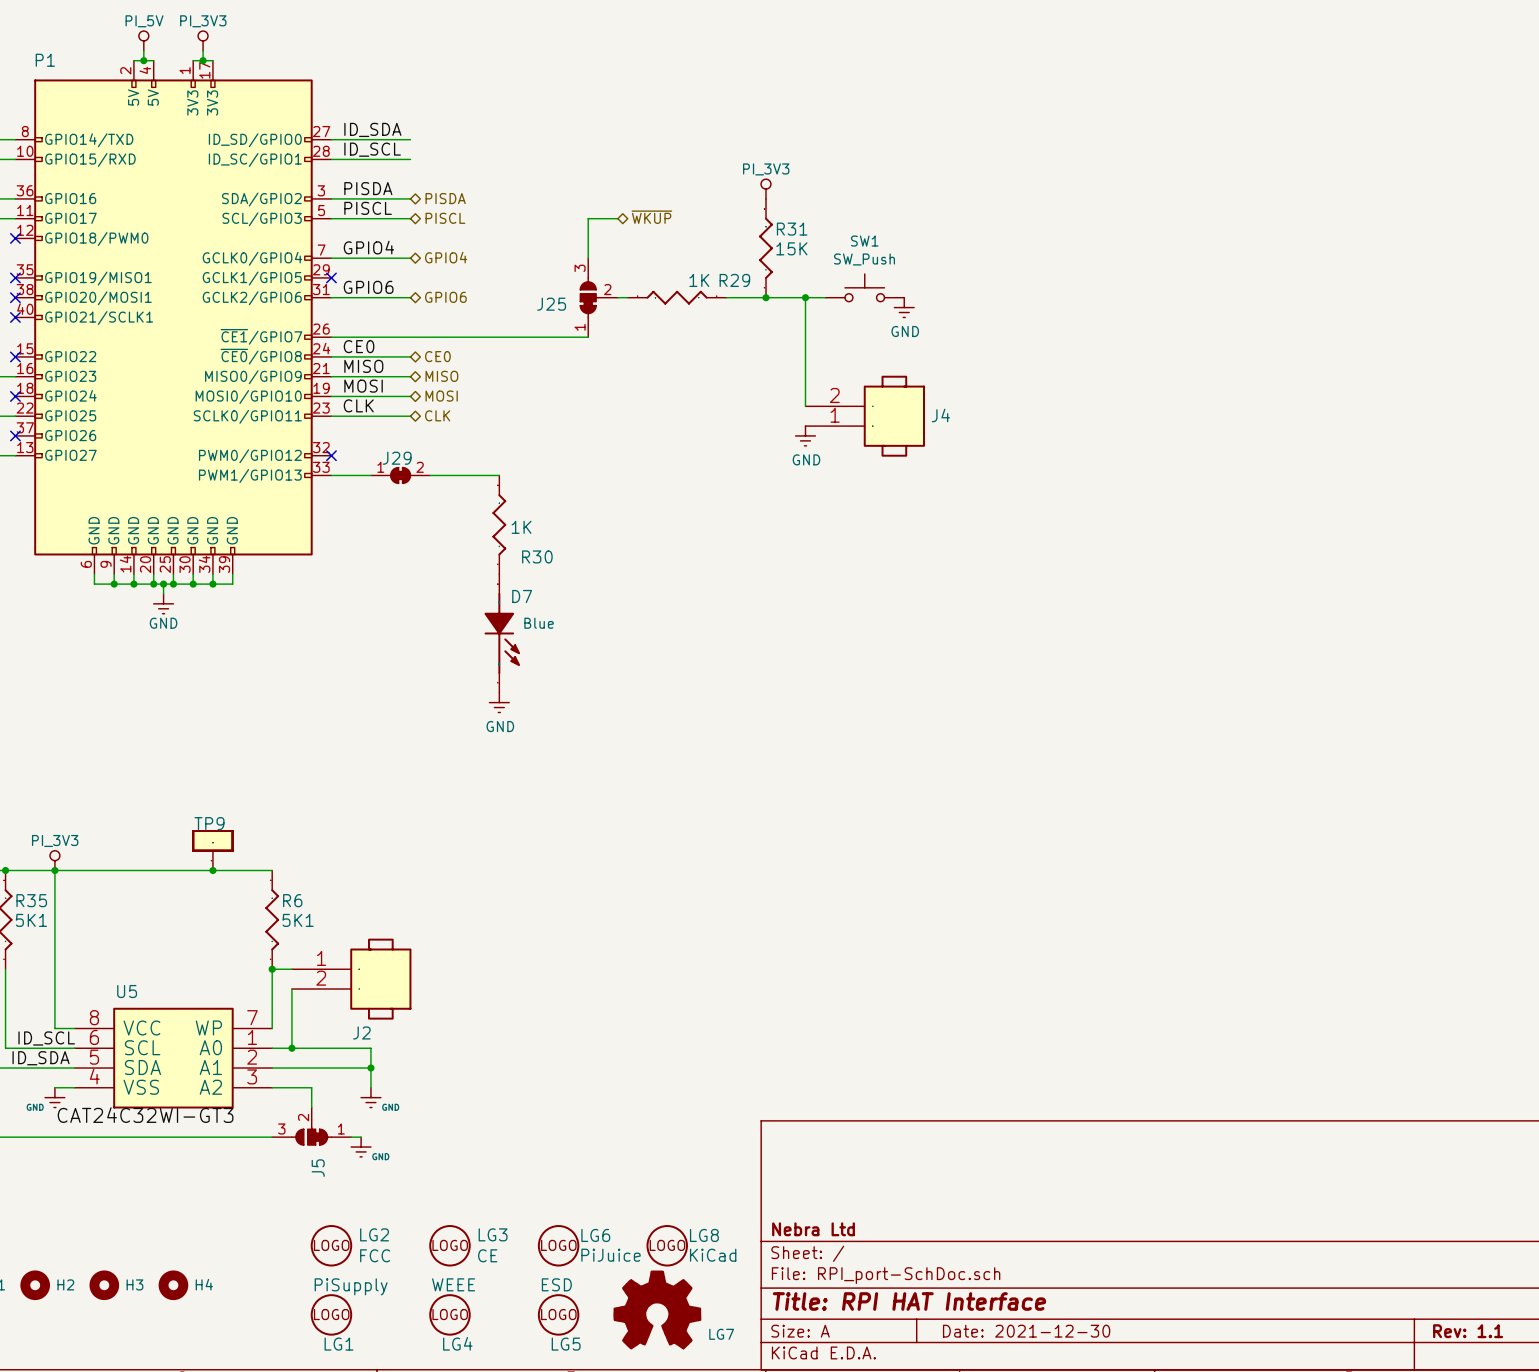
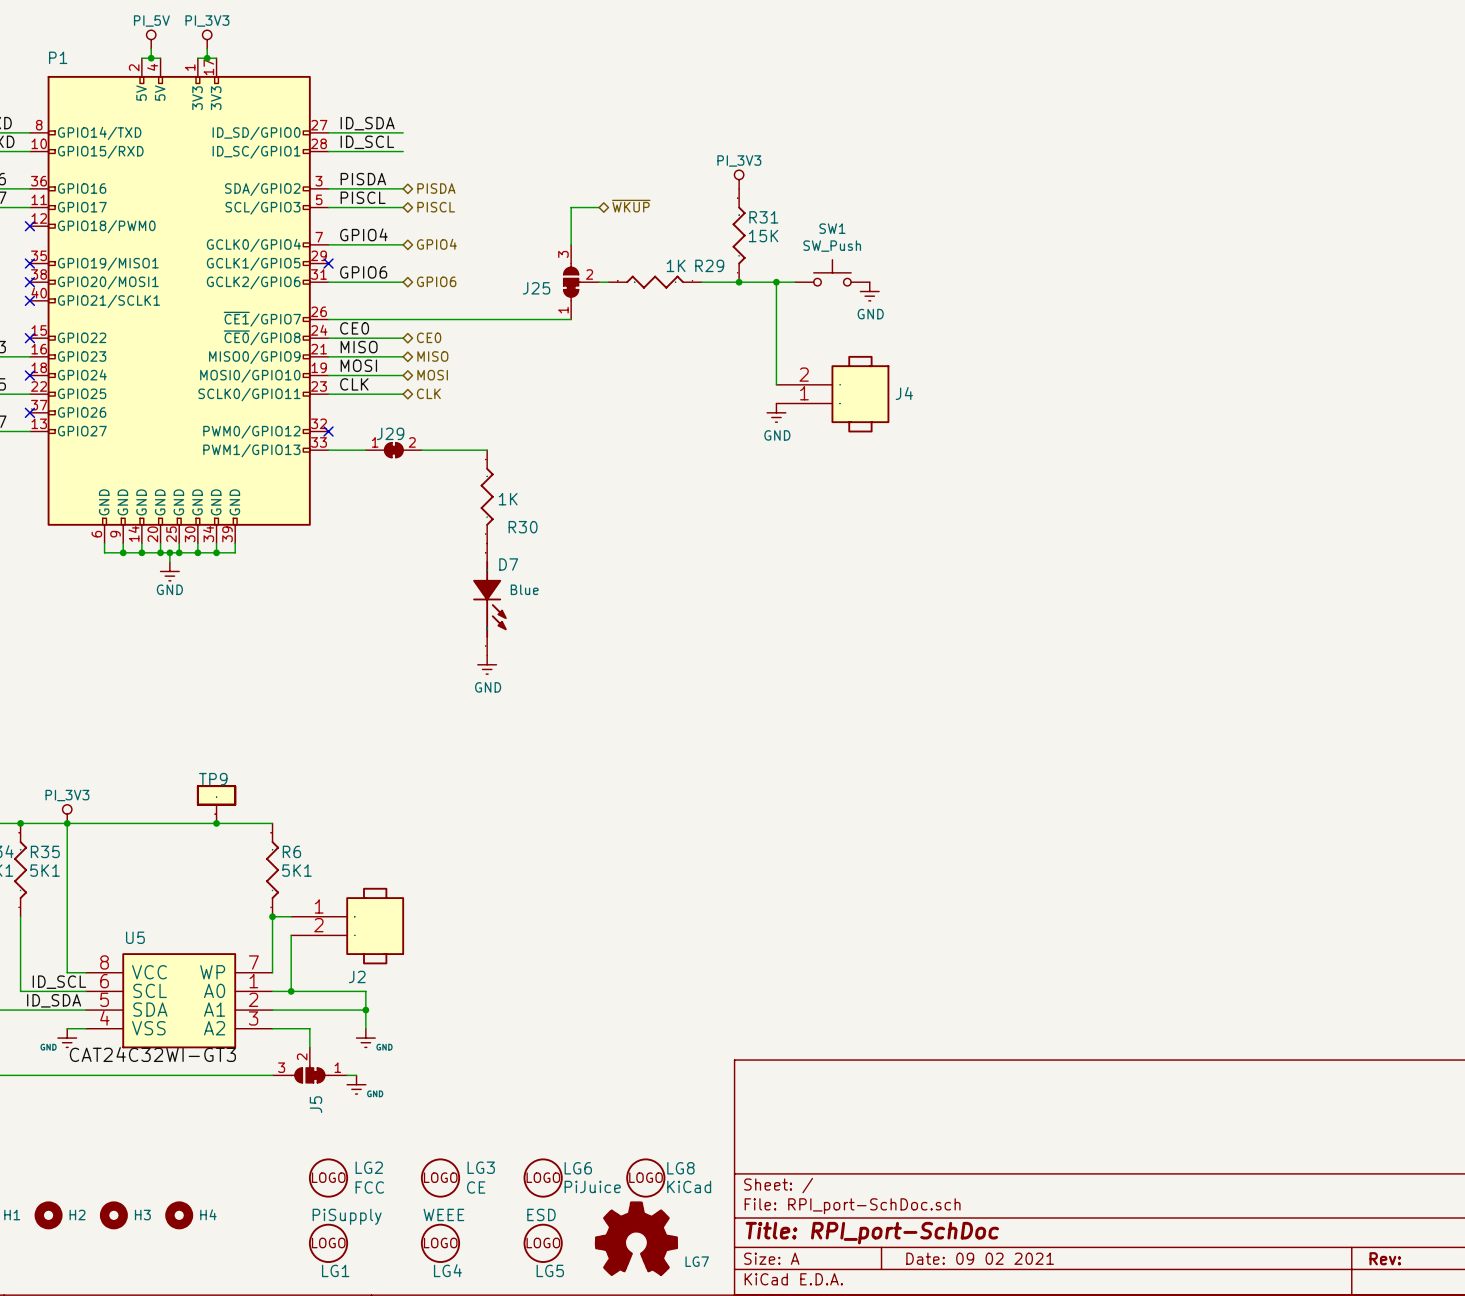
title block: Nebra Ltd (813, 1229) -> none
title block: Title: RPI HAT Interface (909, 1301) -> Title: RPI_port-SchDoc (872, 1233)
title block: Date: 2021-12-30 (1026, 1331) -> Date: 09 02 2021 (980, 1258)
title block: Rev: 1.1 (1468, 1331) -> Rev: (1385, 1258)

